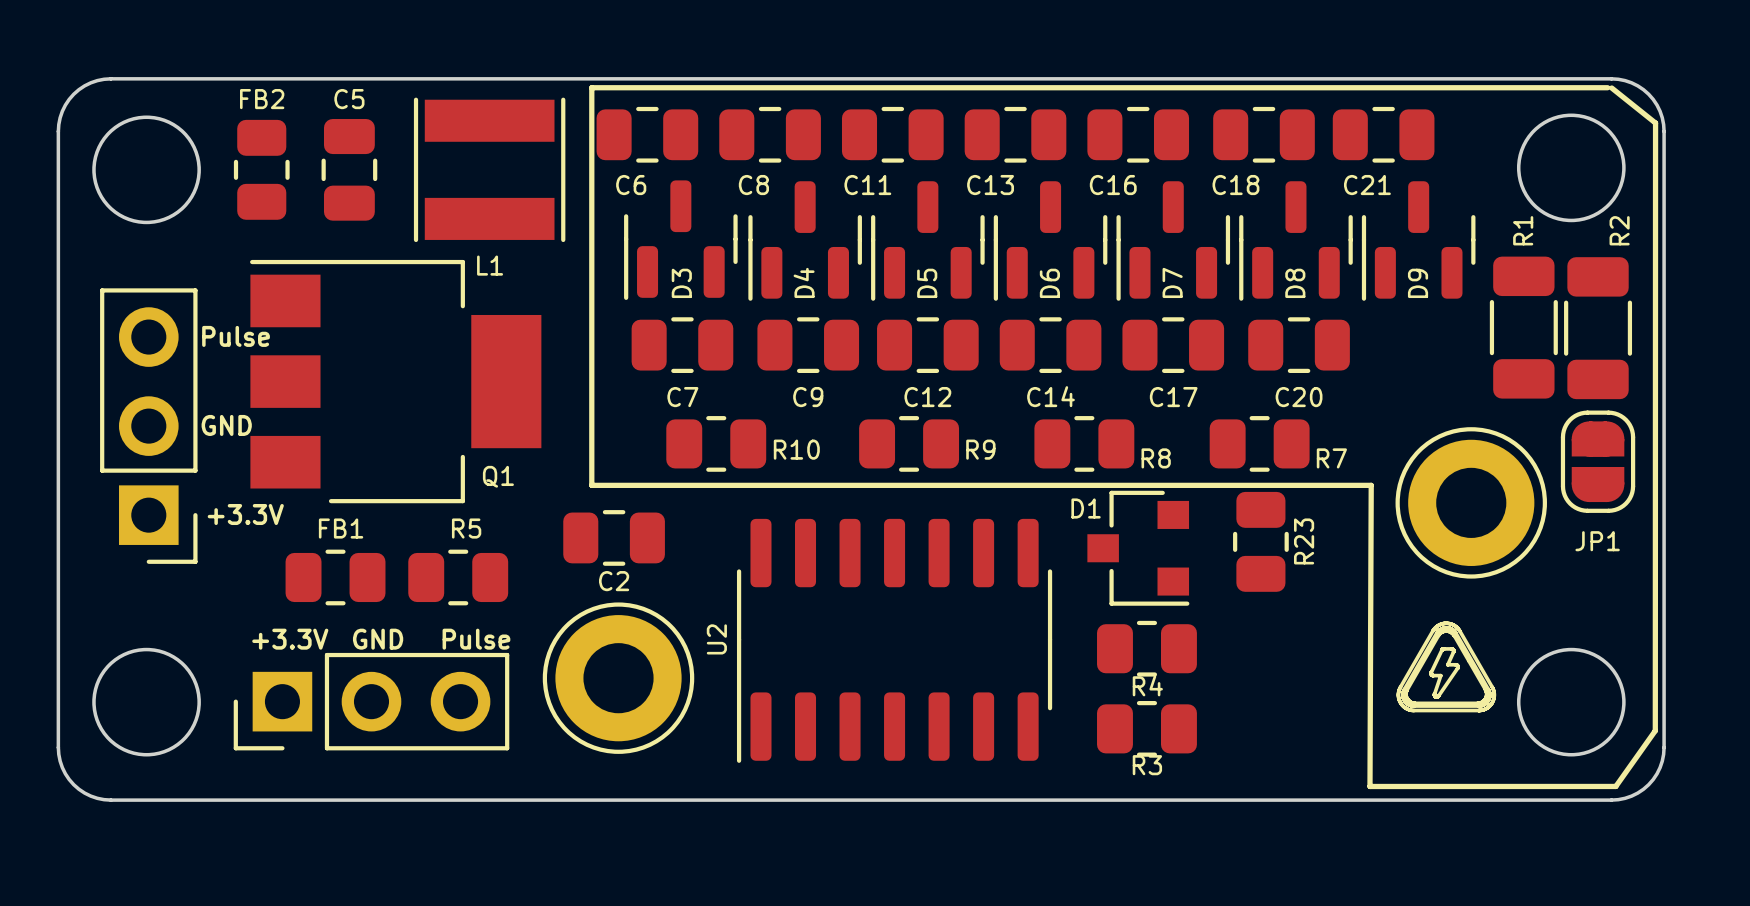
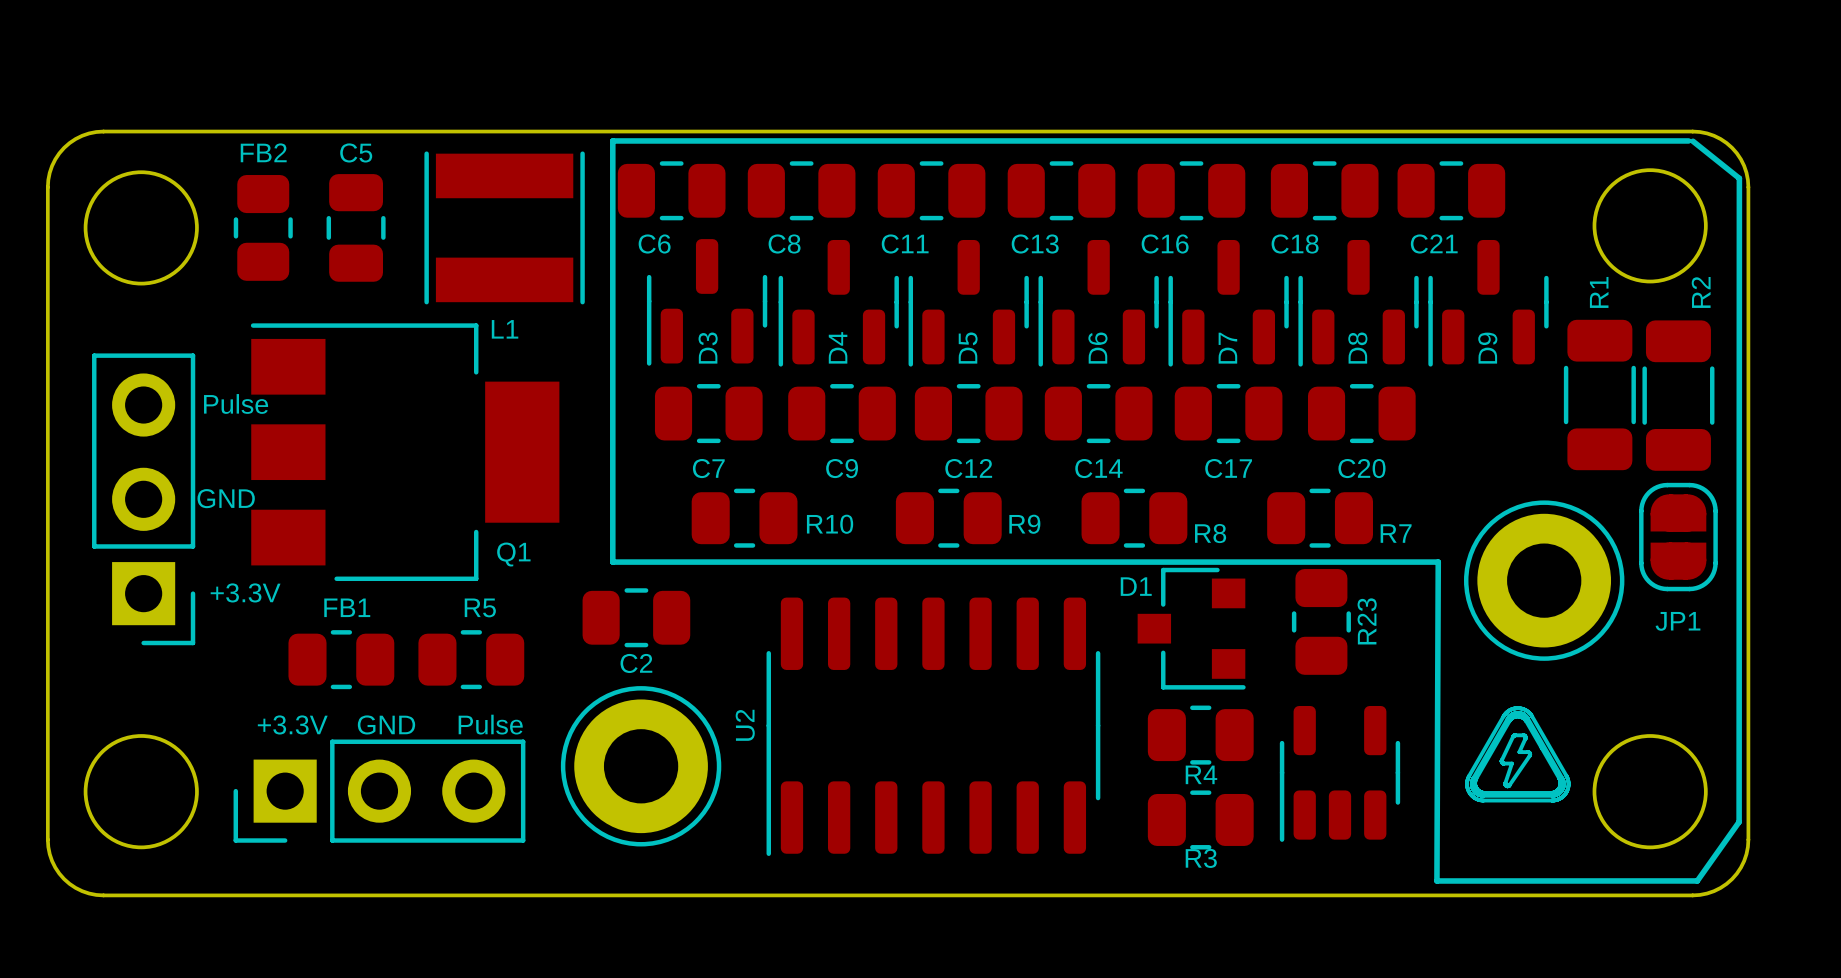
part: none -> (1339, 773)

